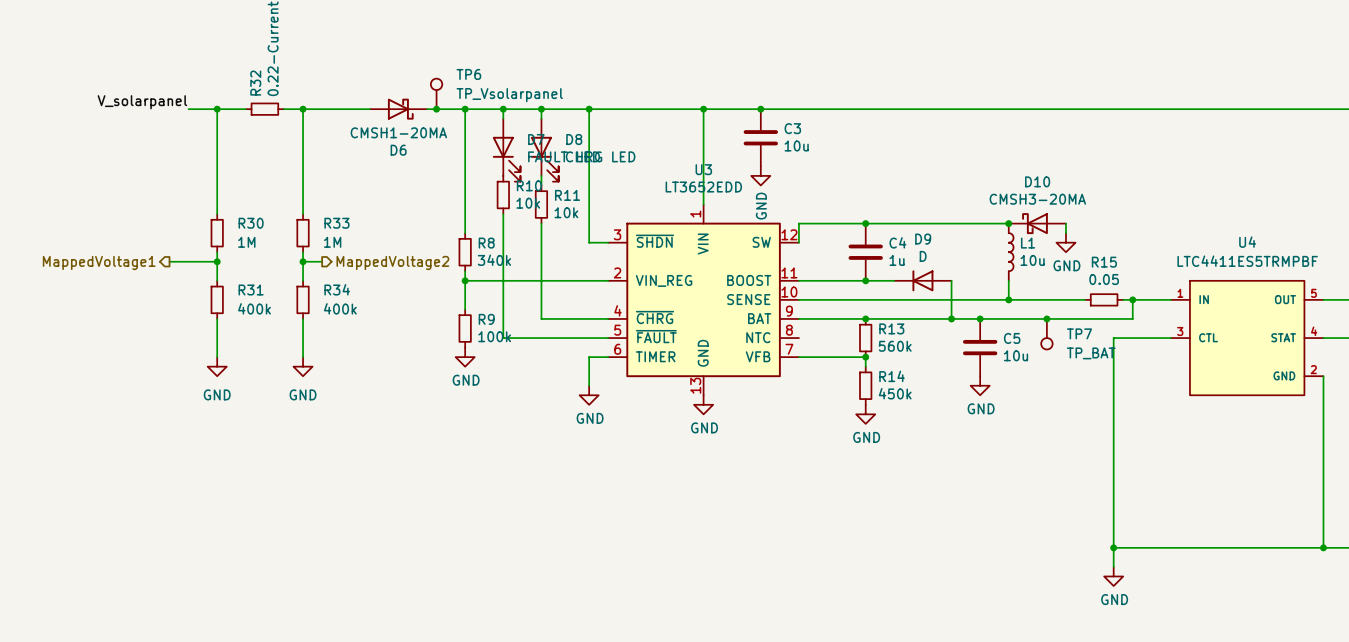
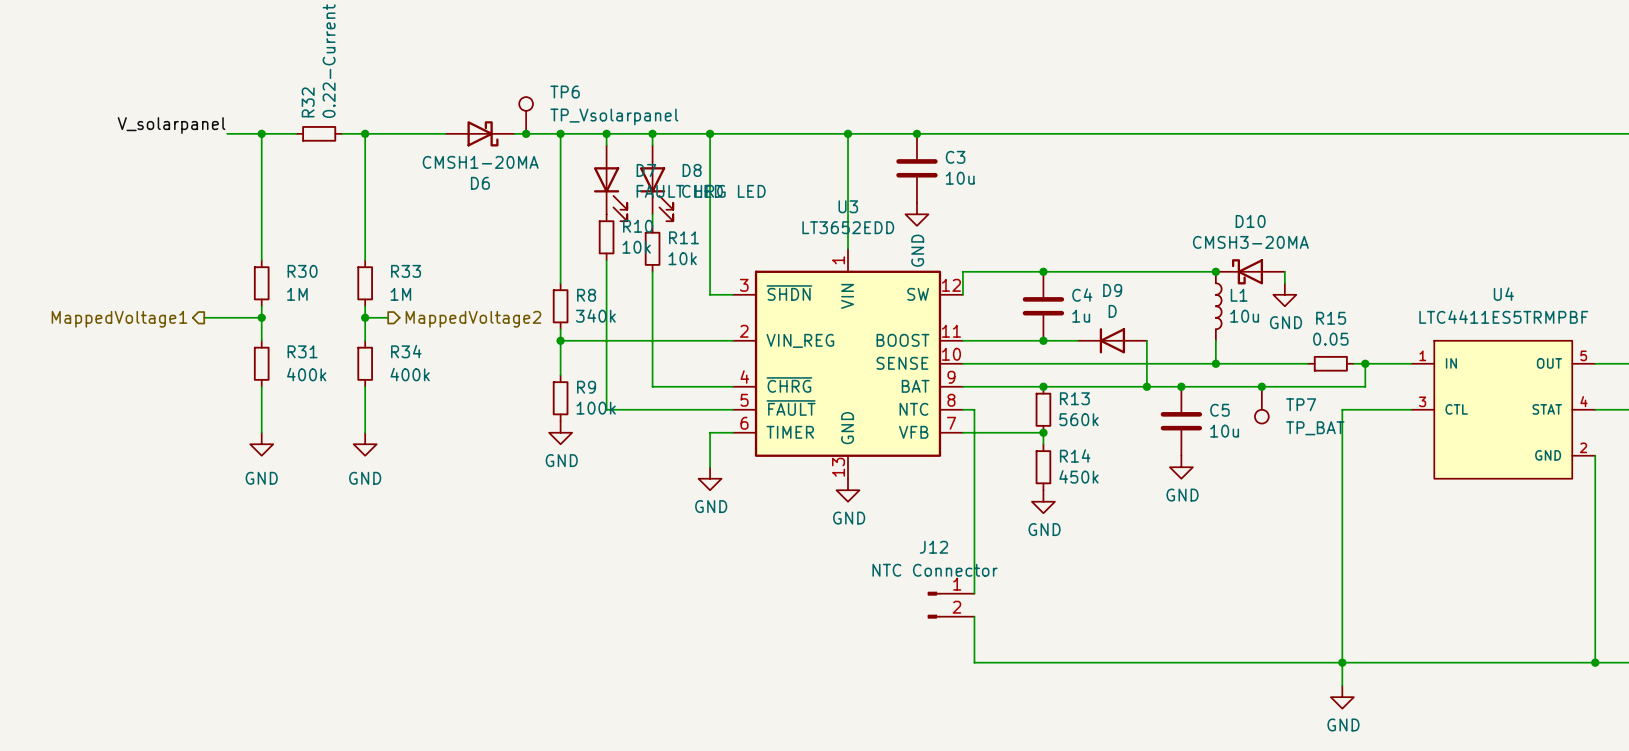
wire: none -> (962, 409) (974, 409) (974, 593)
J12: none -> NTC Connector (951, 605)
wire: none -> (974, 616) (974, 662) (1342, 662)

